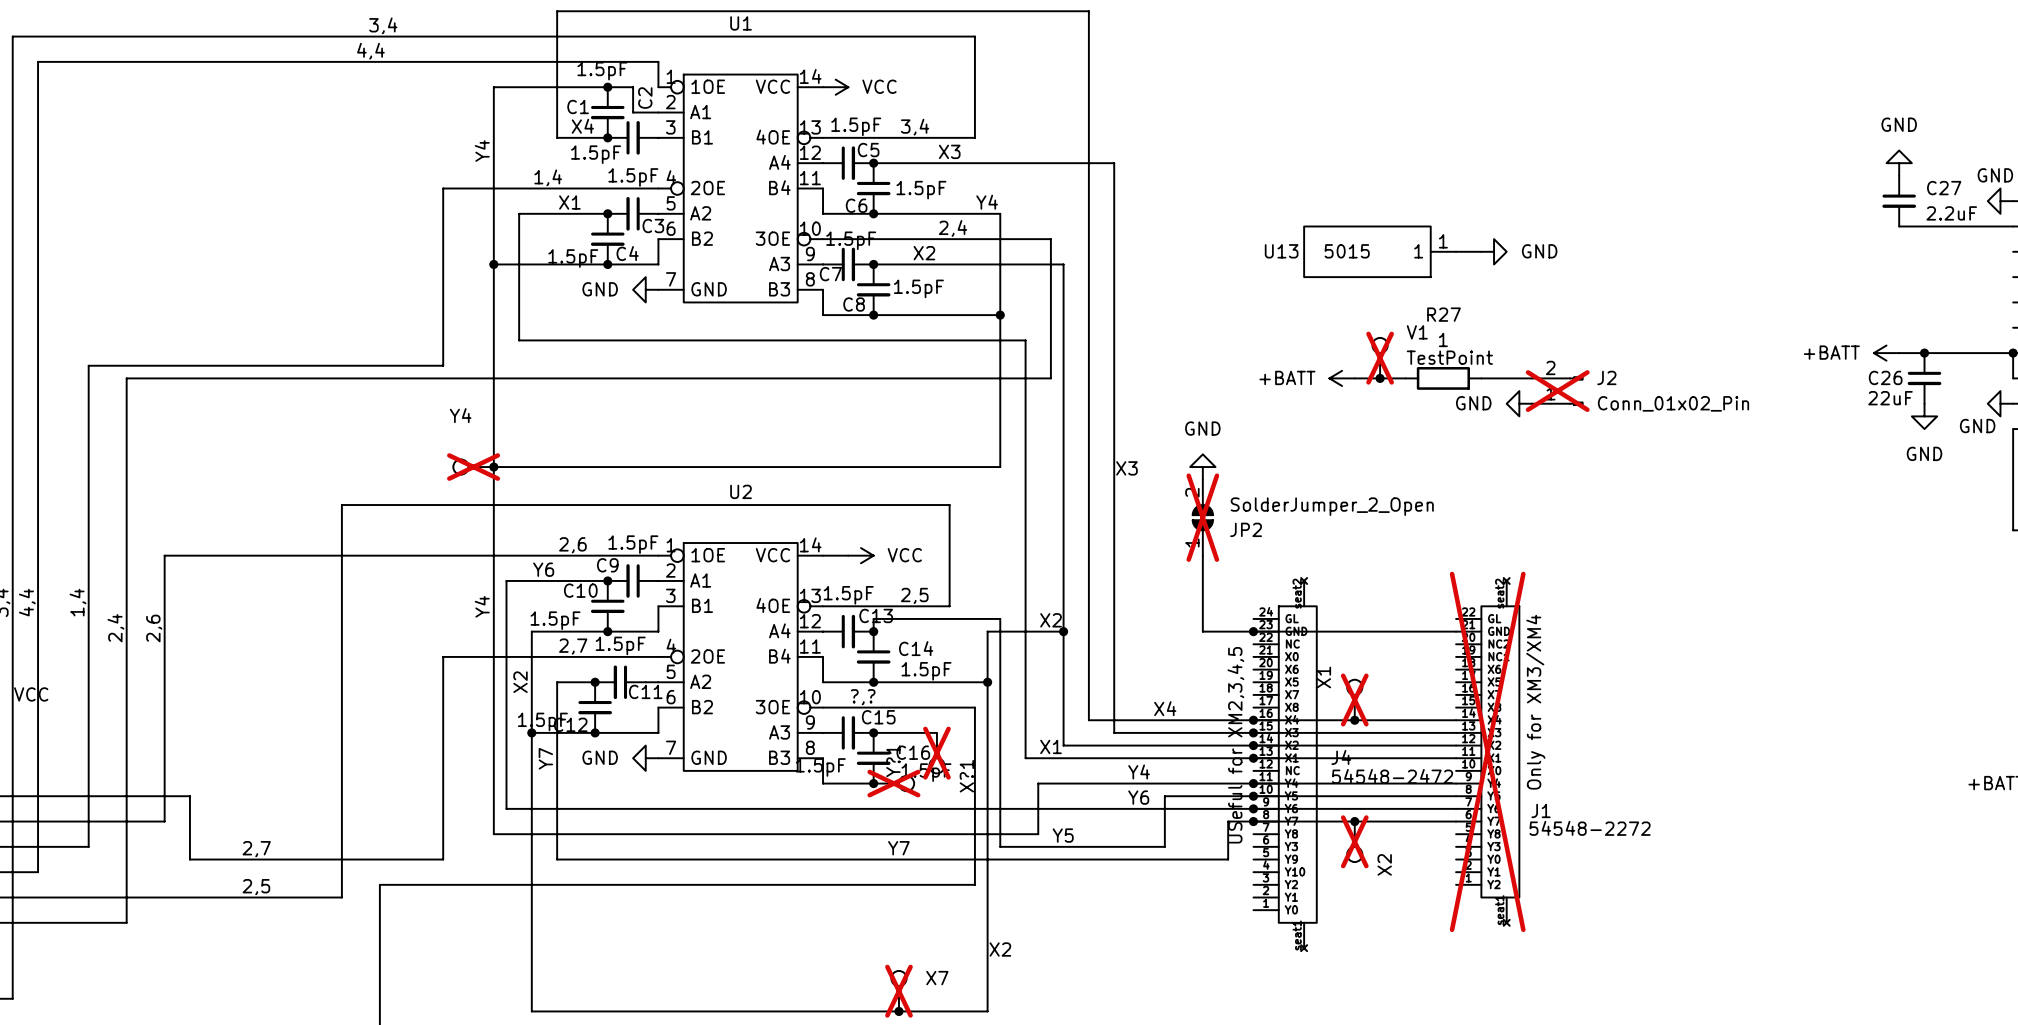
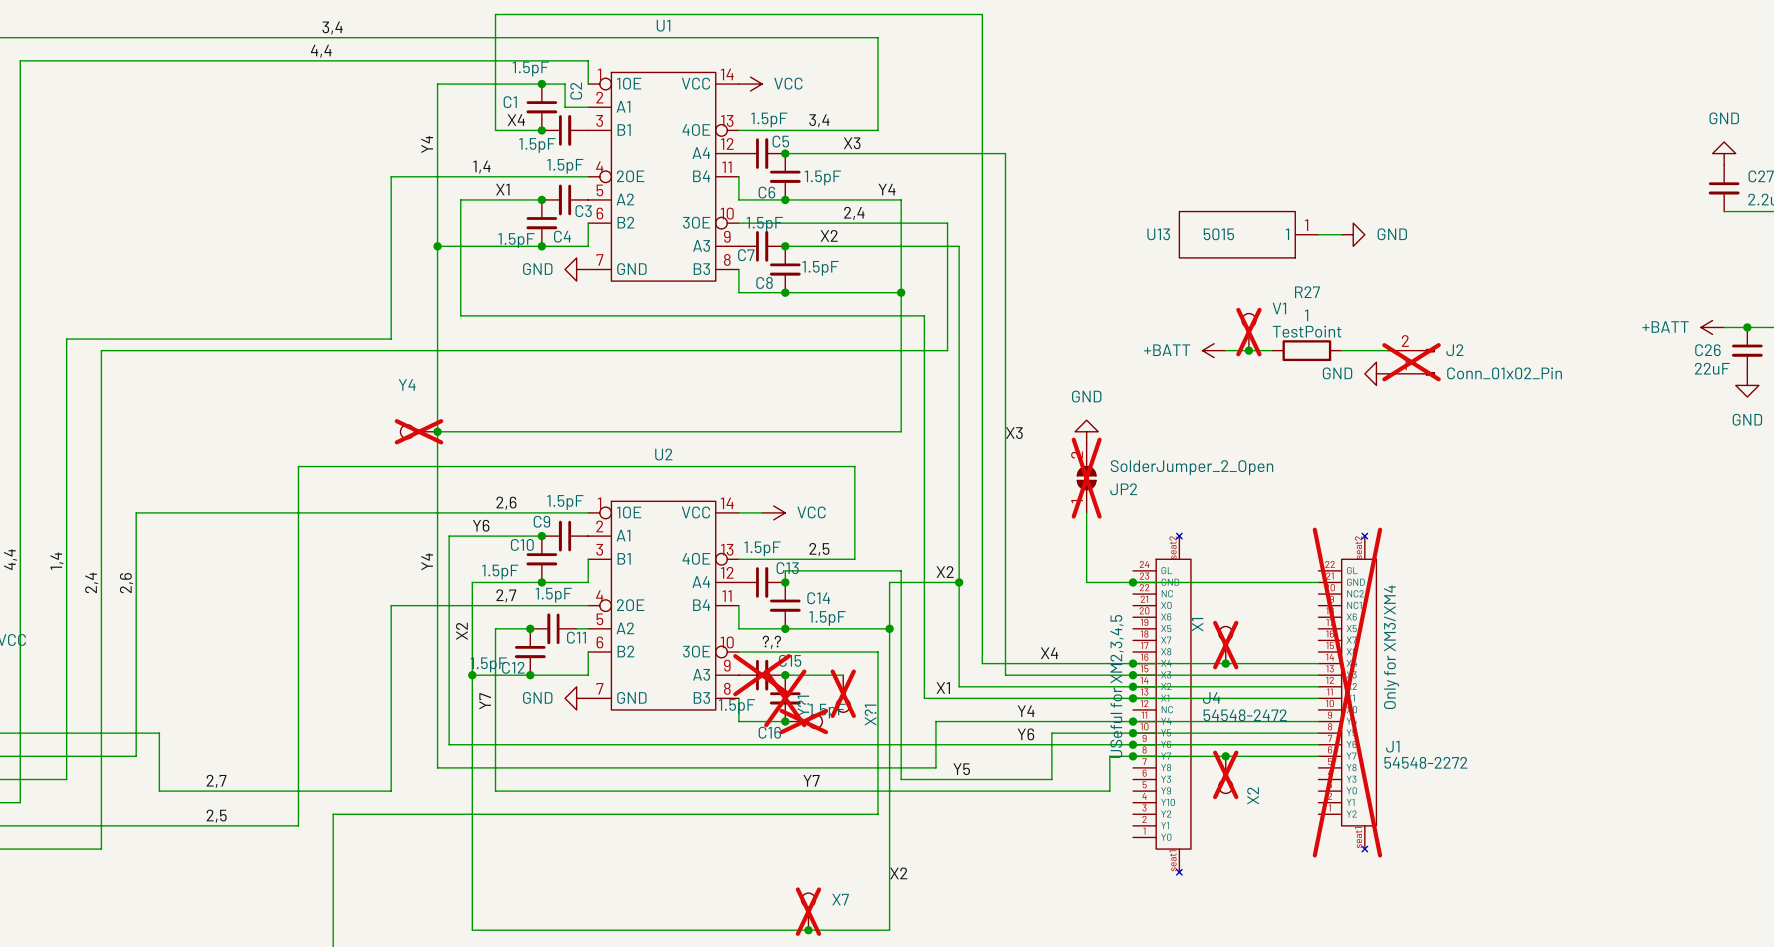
C15 do-not-place cross: none -> (762, 675)
C16 name position: C16 (913, 752) -> C16 (769, 732)
C16 do-not-place cross: none -> (785, 698)

